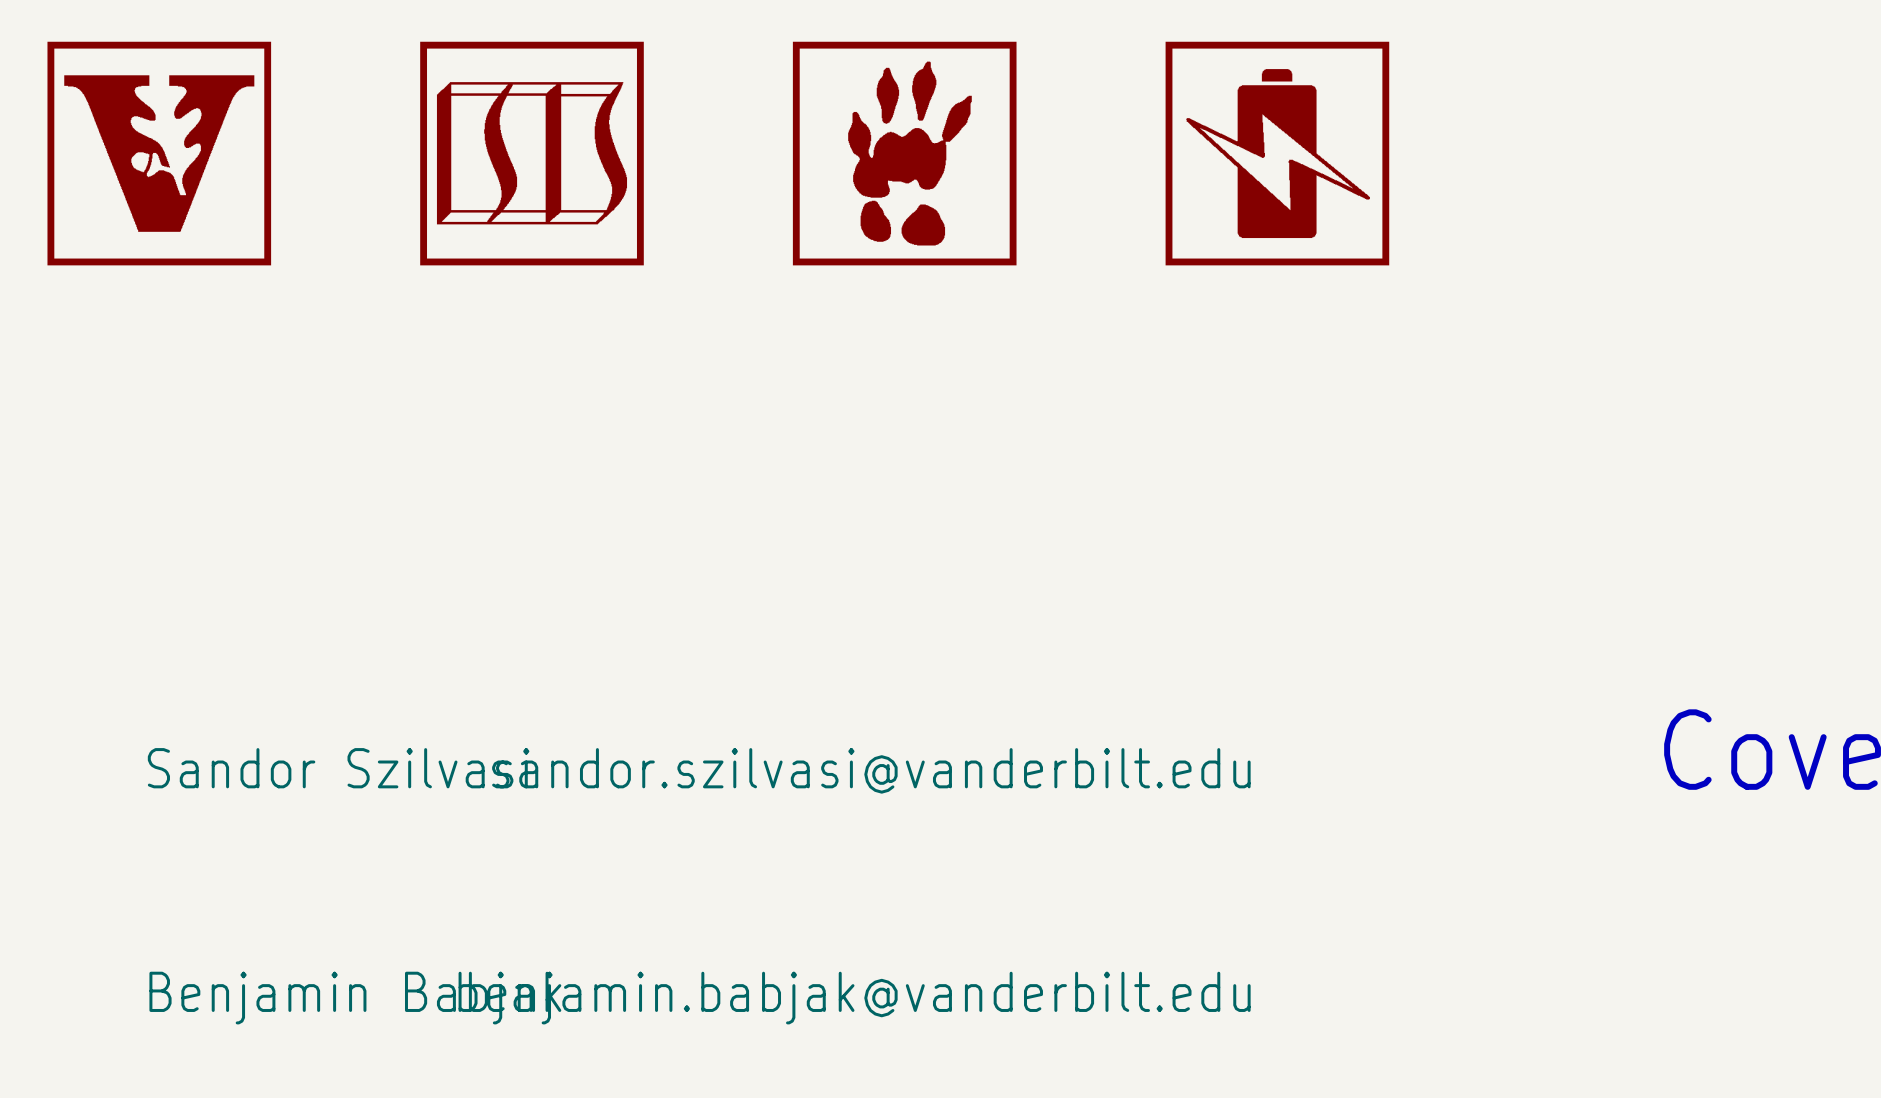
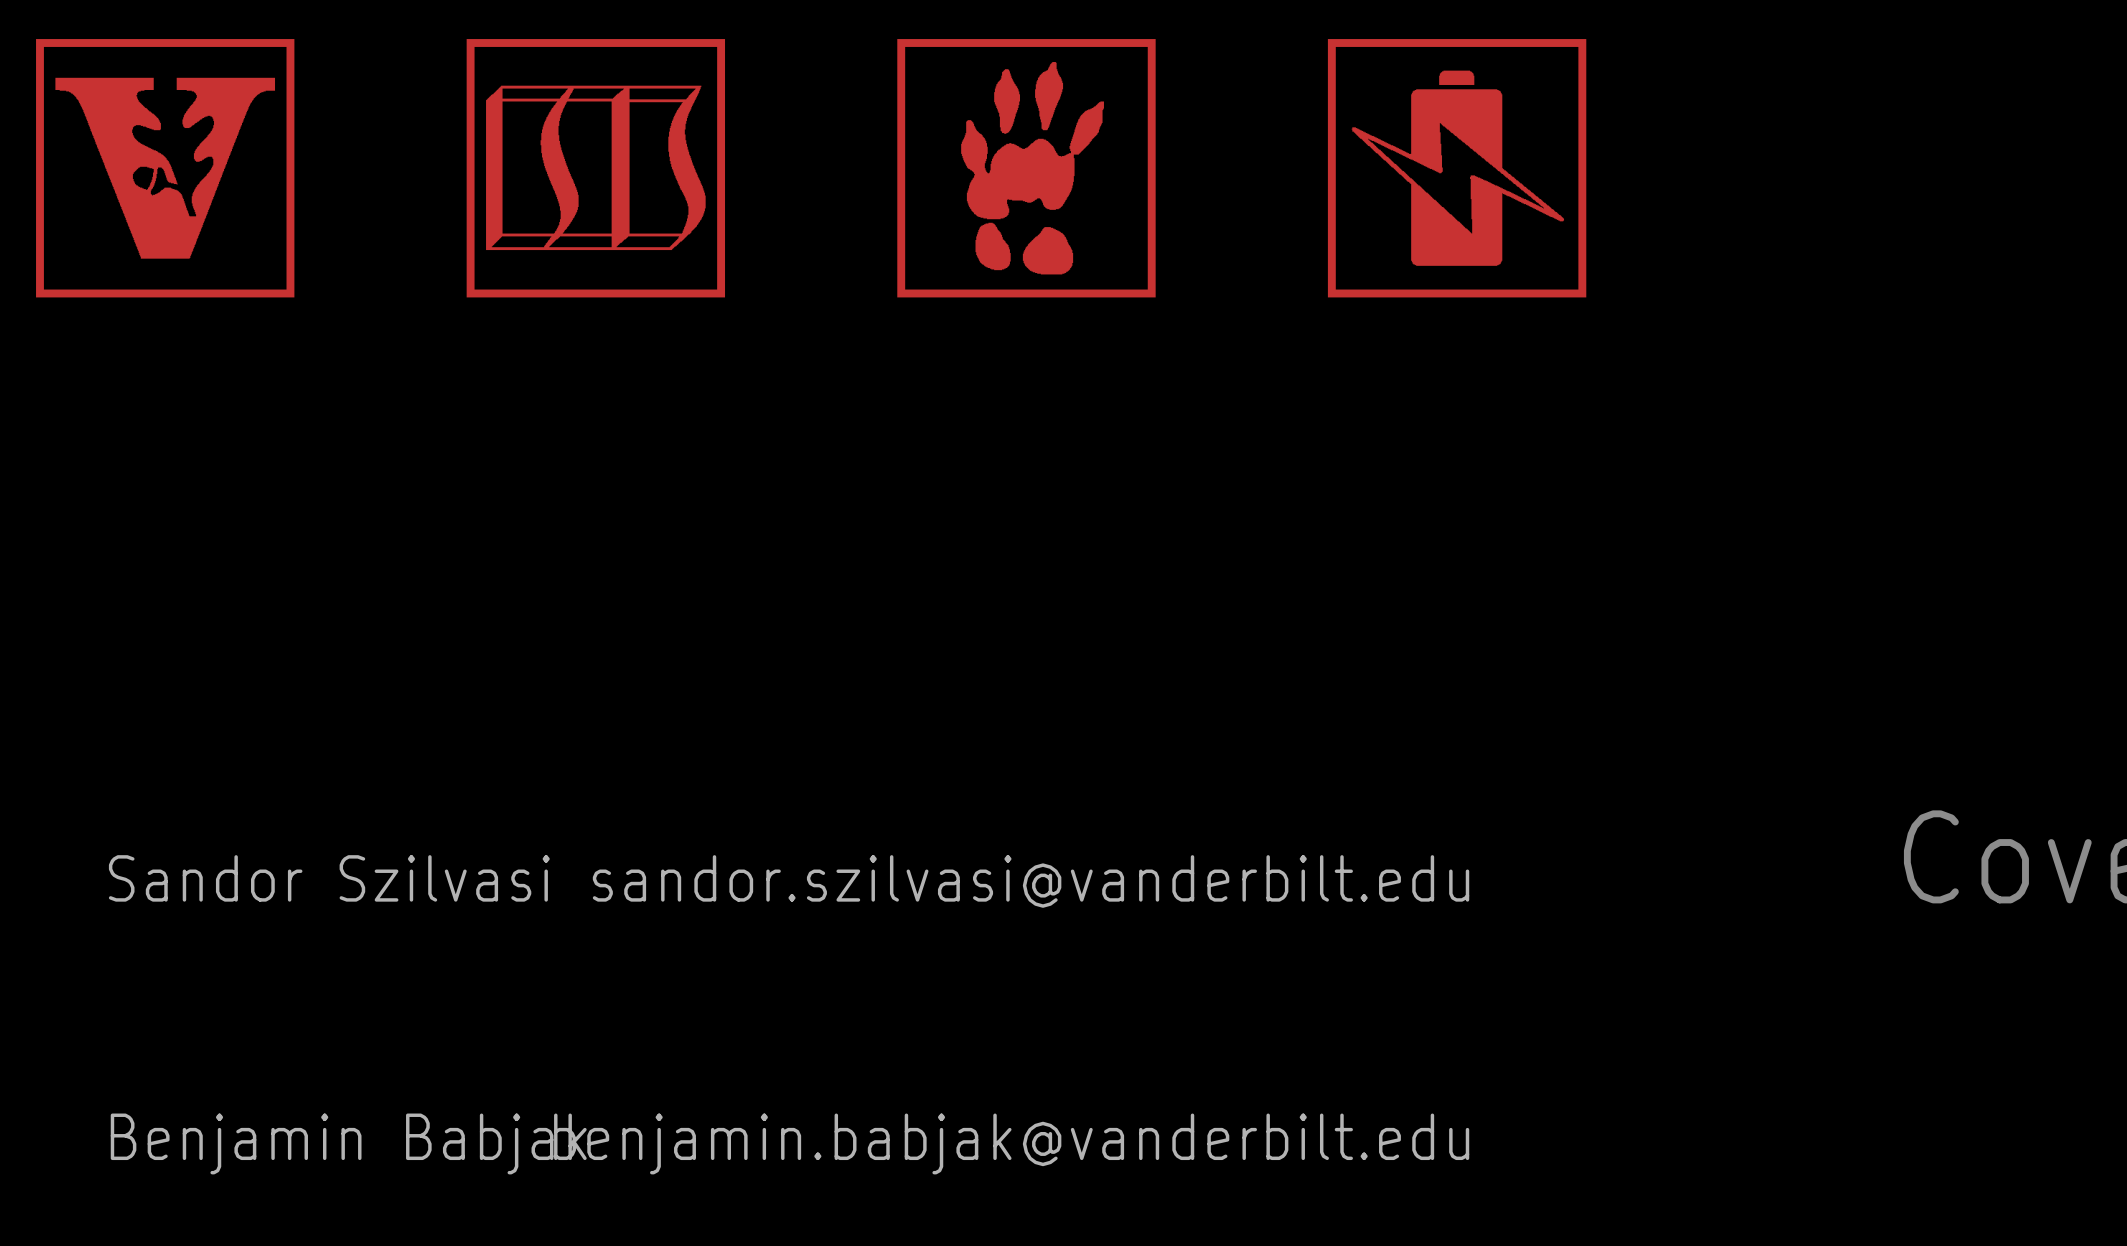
text position: Sandor Szilvasi (338, 768) -> Sandor Szilvasi (329, 878)
text position: sandor.szilvasi@vanderbilt.edu (871, 770) -> sandor.szilvasi@vanderbilt.edu (1031, 881)
text position: Benjamin Babjak (355, 998) -> Benjamin Babjak (348, 1143)
text position: benjamin.babjak@vanderbilt.edu (854, 998) -> benjamin.babjak@vanderbilt.edu (1011, 1143)

